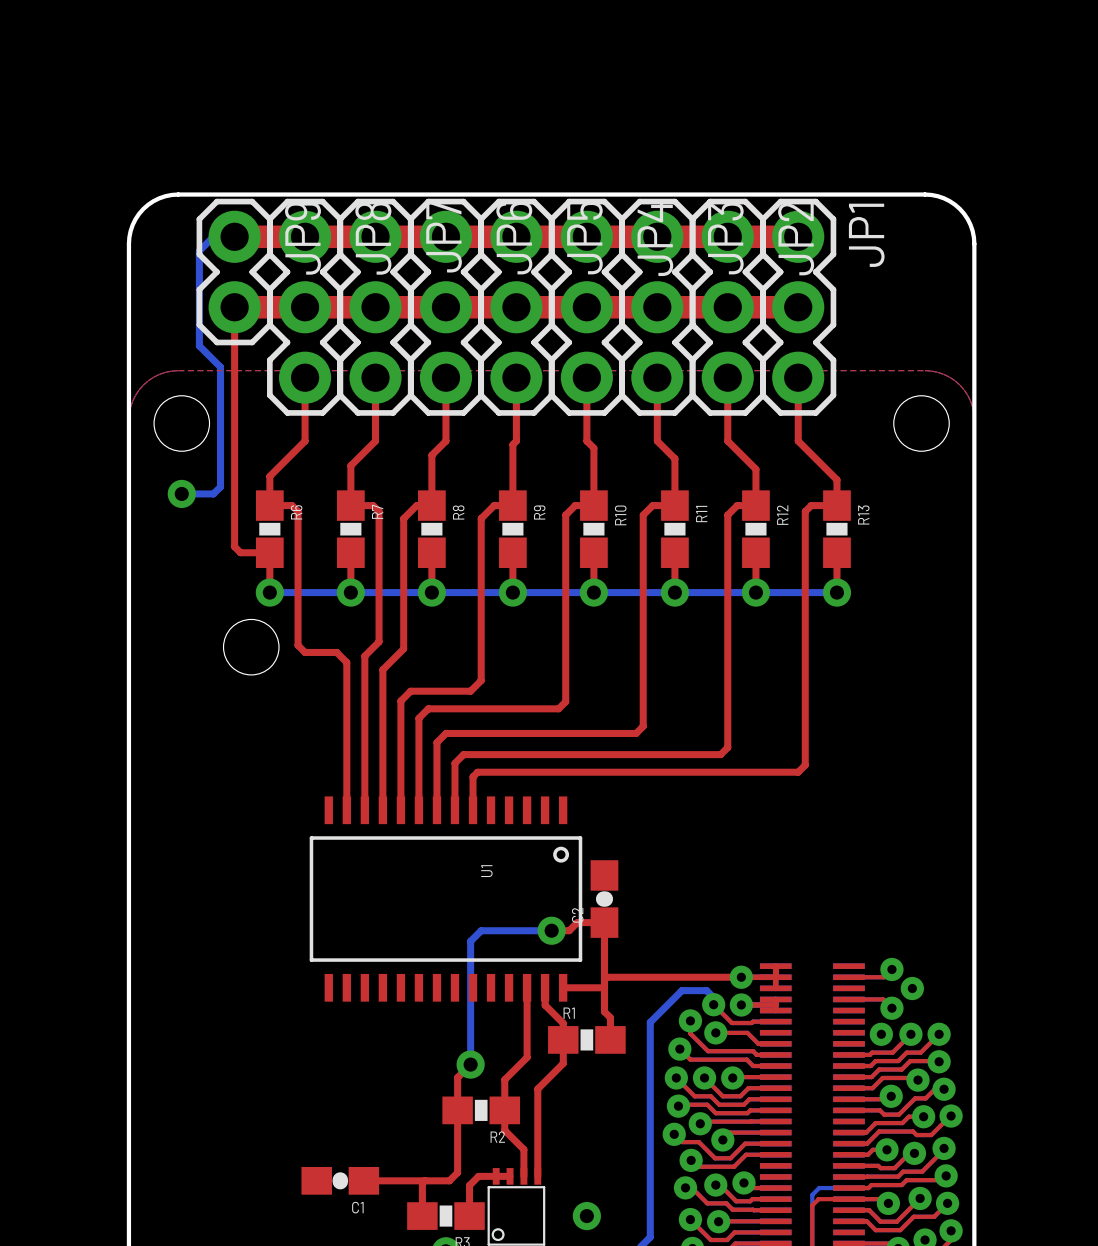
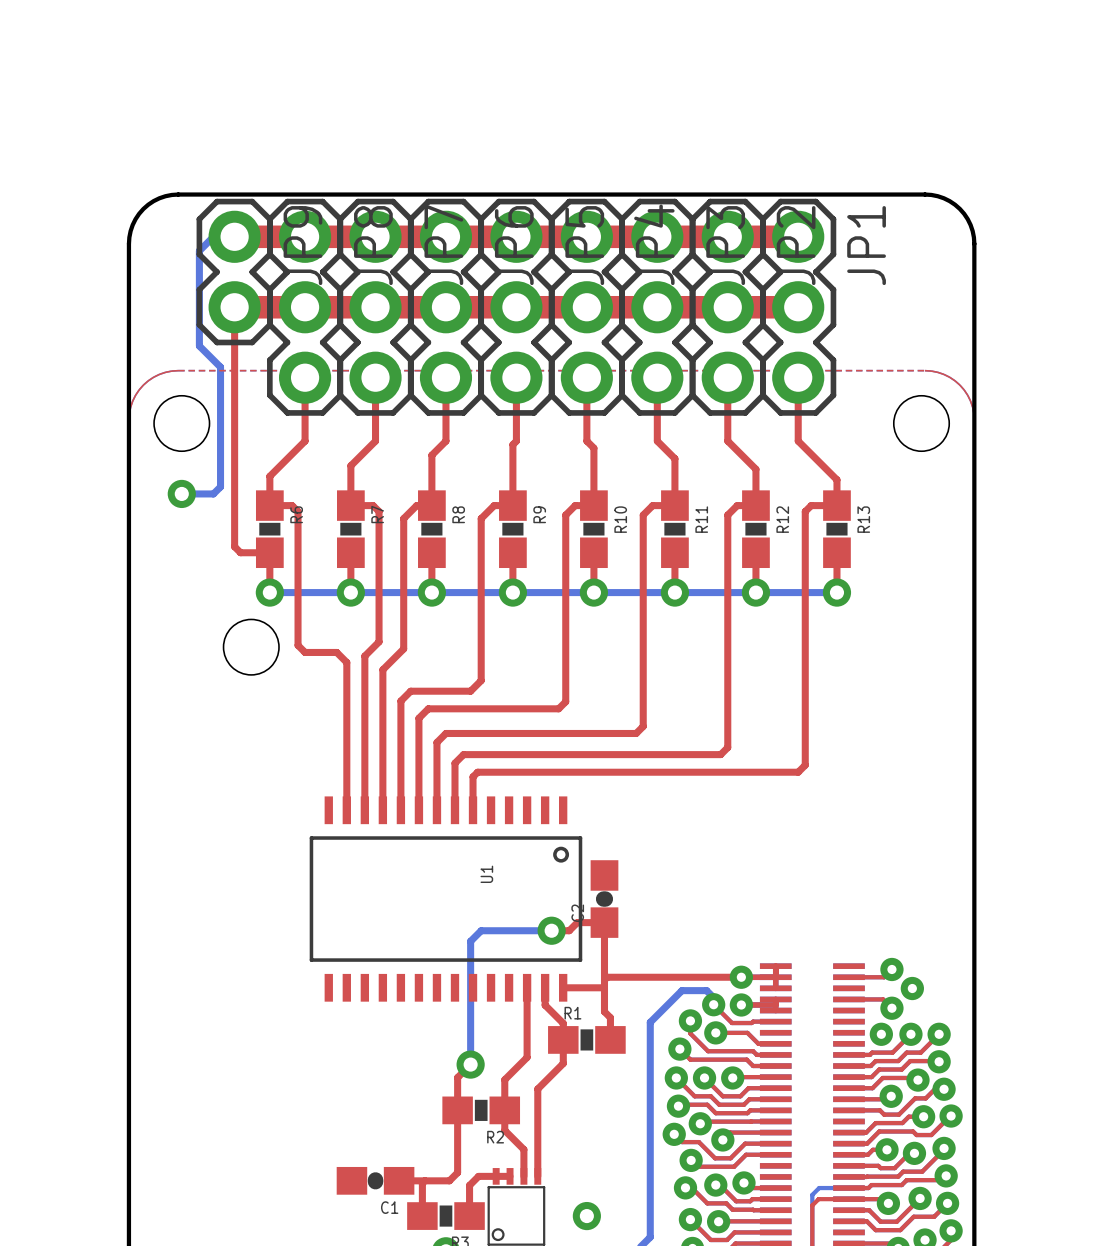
C1 position: (340, 1180) -> (375, 1180)
top track: (363, 1180) (399, 1180) -> none

